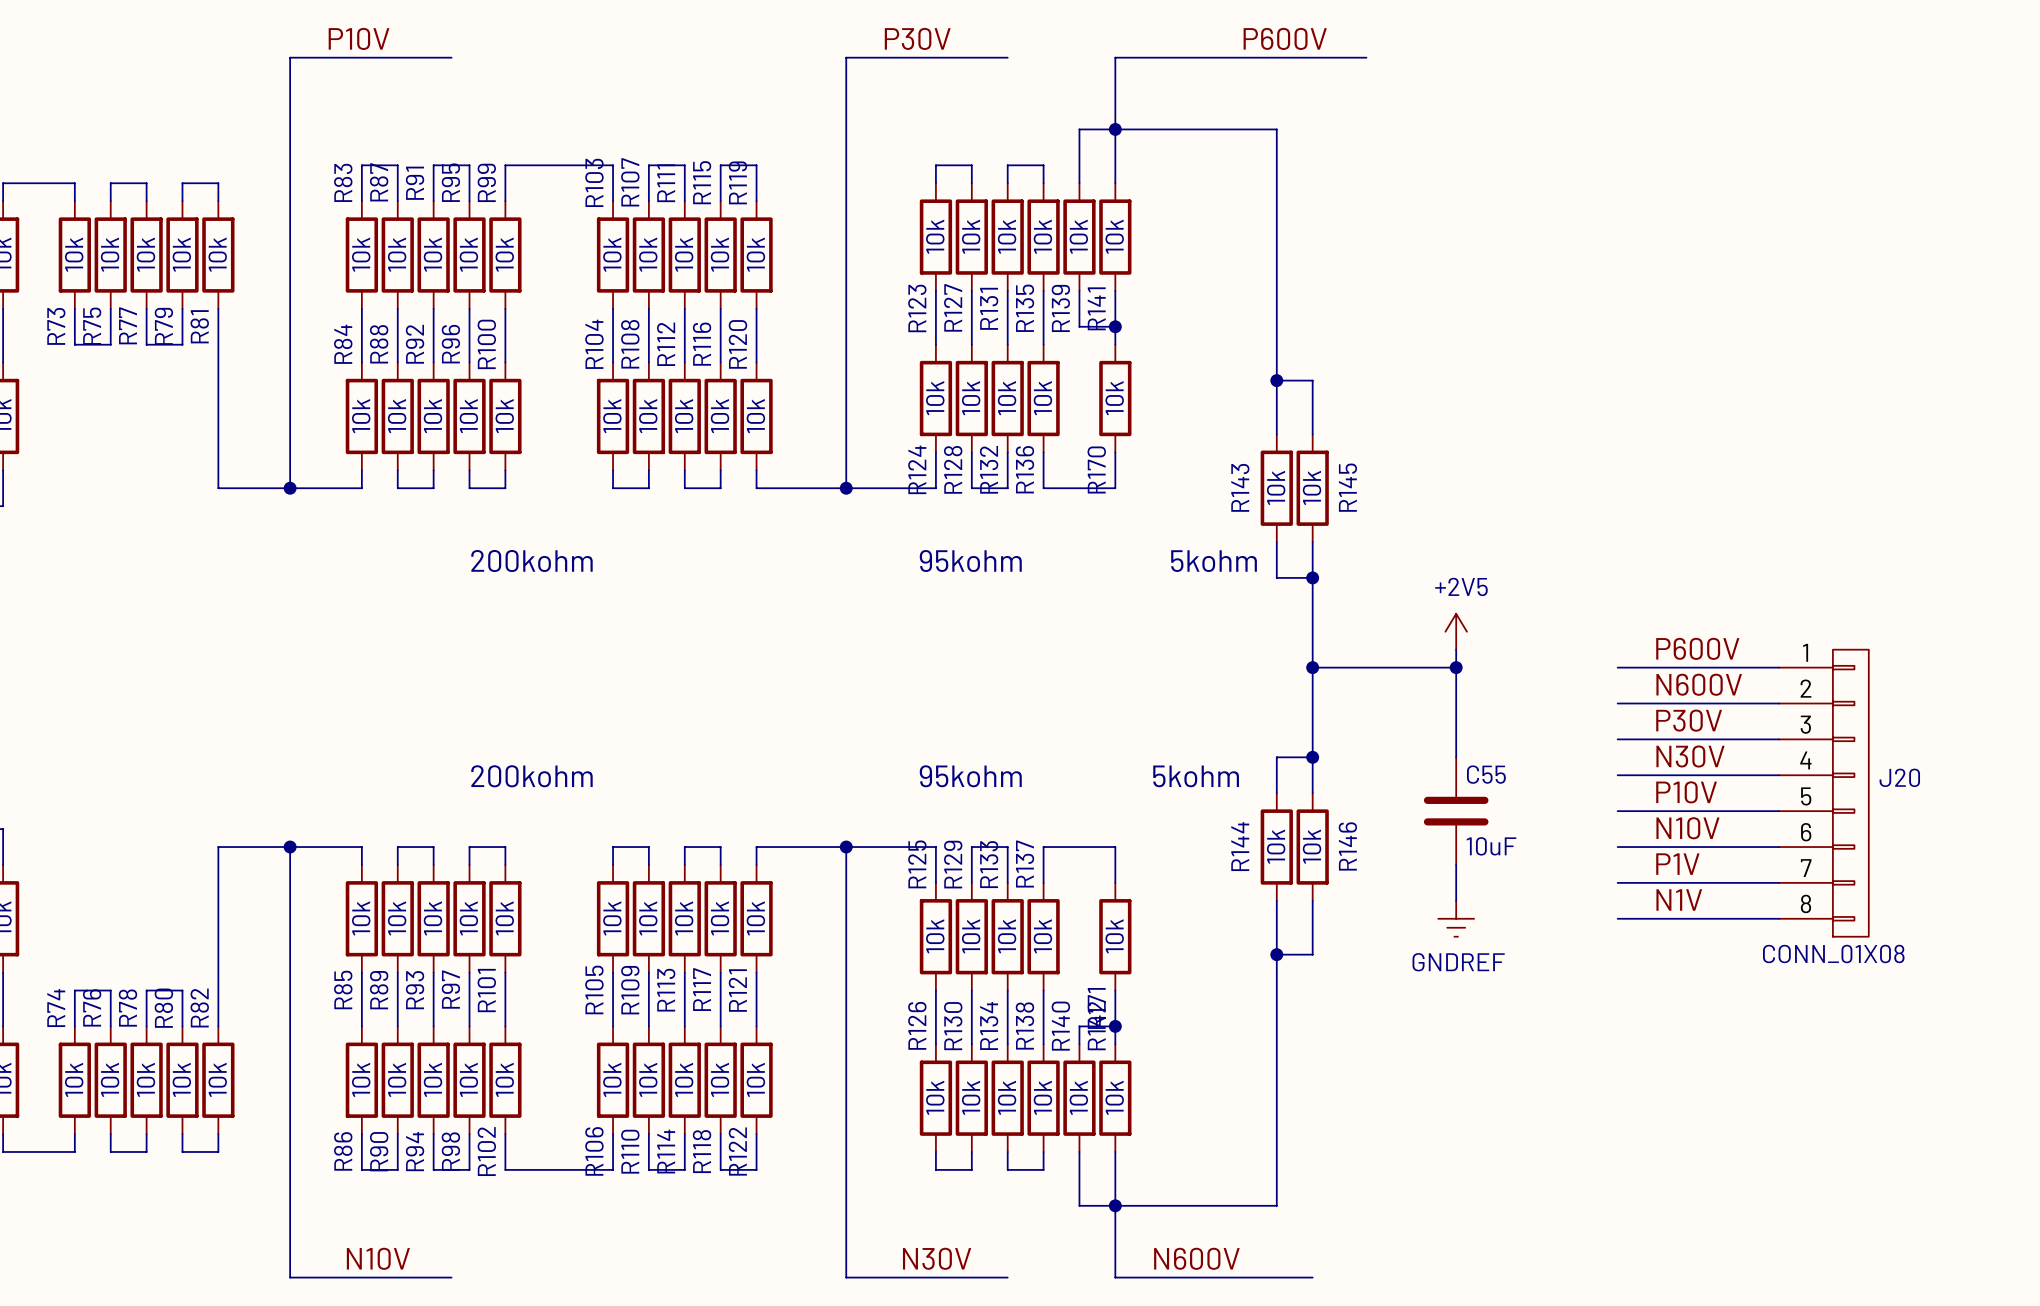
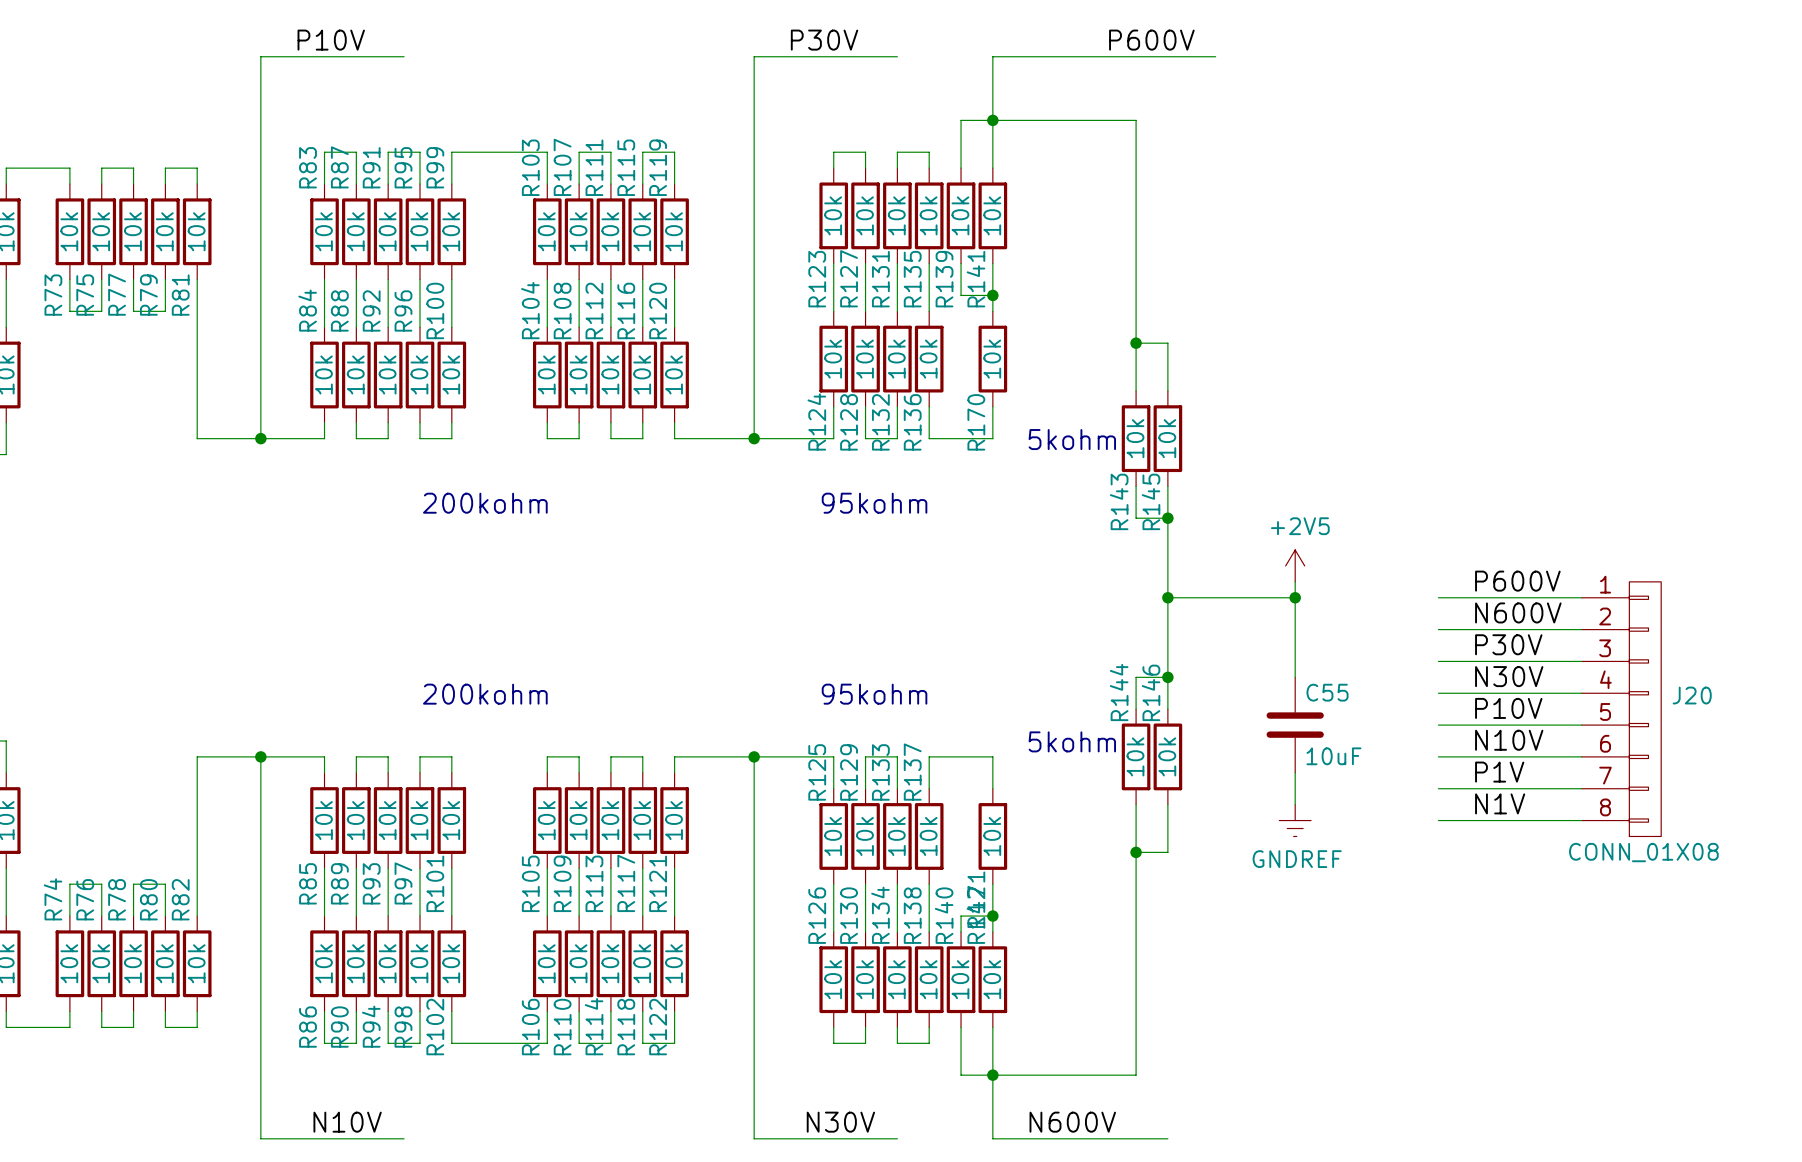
R143 name position: R143 (1240, 487) -> R143 (1119, 501)
R145 name position: R145 (1347, 487) -> R145 (1151, 501)
text position: 5kohm (1214, 561) -> 5kohm (1072, 439)
text position: 5kohm (1196, 776) -> 5kohm (1072, 741)
R144 name position: R144 (1240, 846) -> R144 (1119, 692)
R146 name position: R146 (1347, 846) -> R146 (1151, 692)

